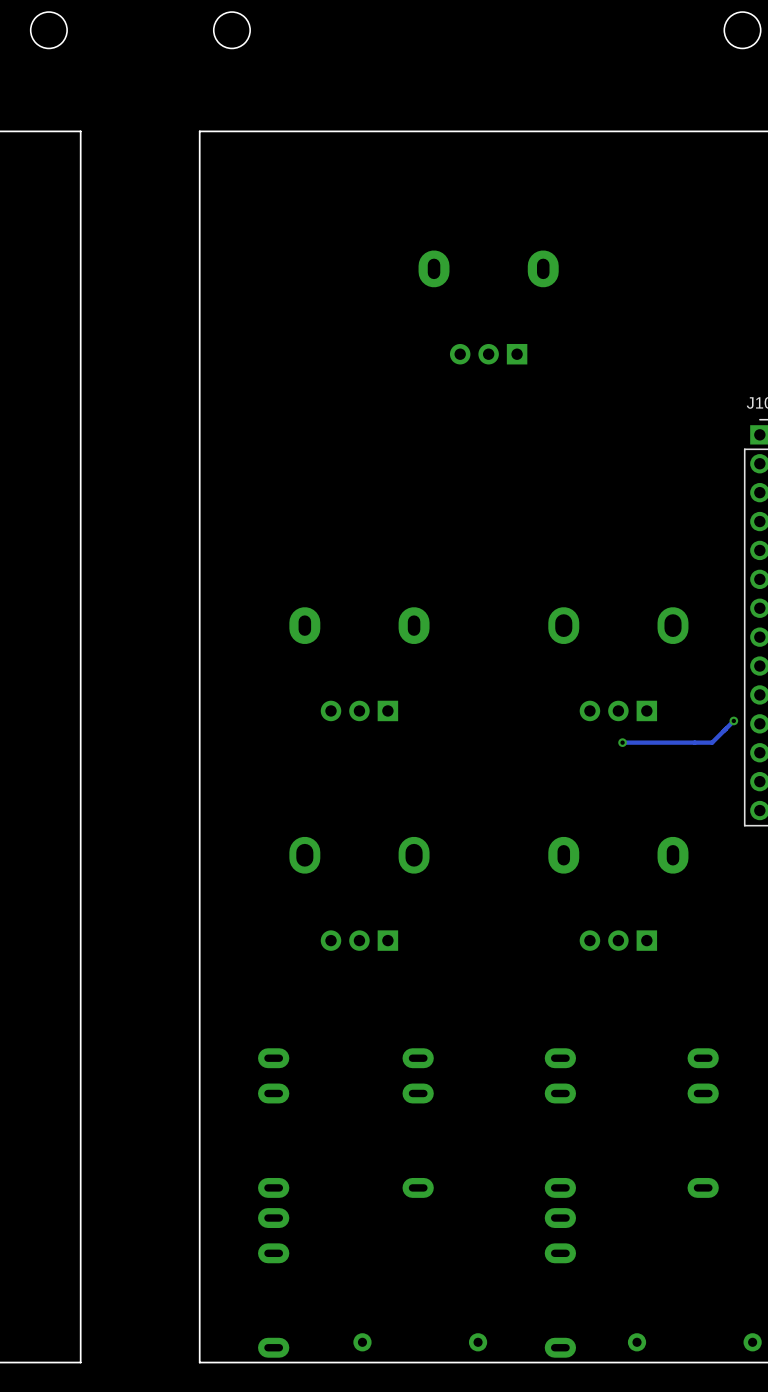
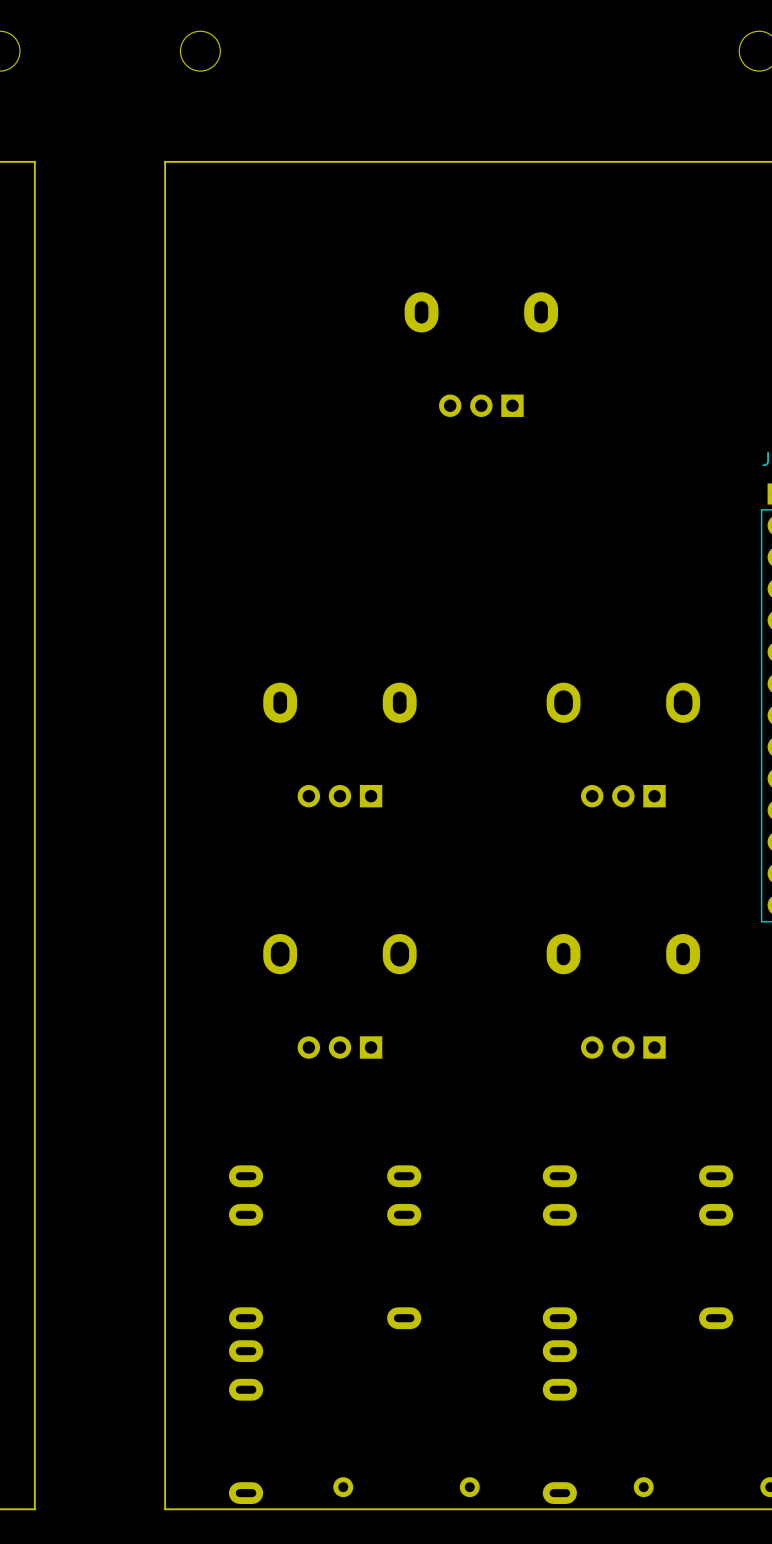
track: (733, 720) (712, 742) (622, 742) -> none
via: (733, 720) -> none
via: (622, 742) -> none

